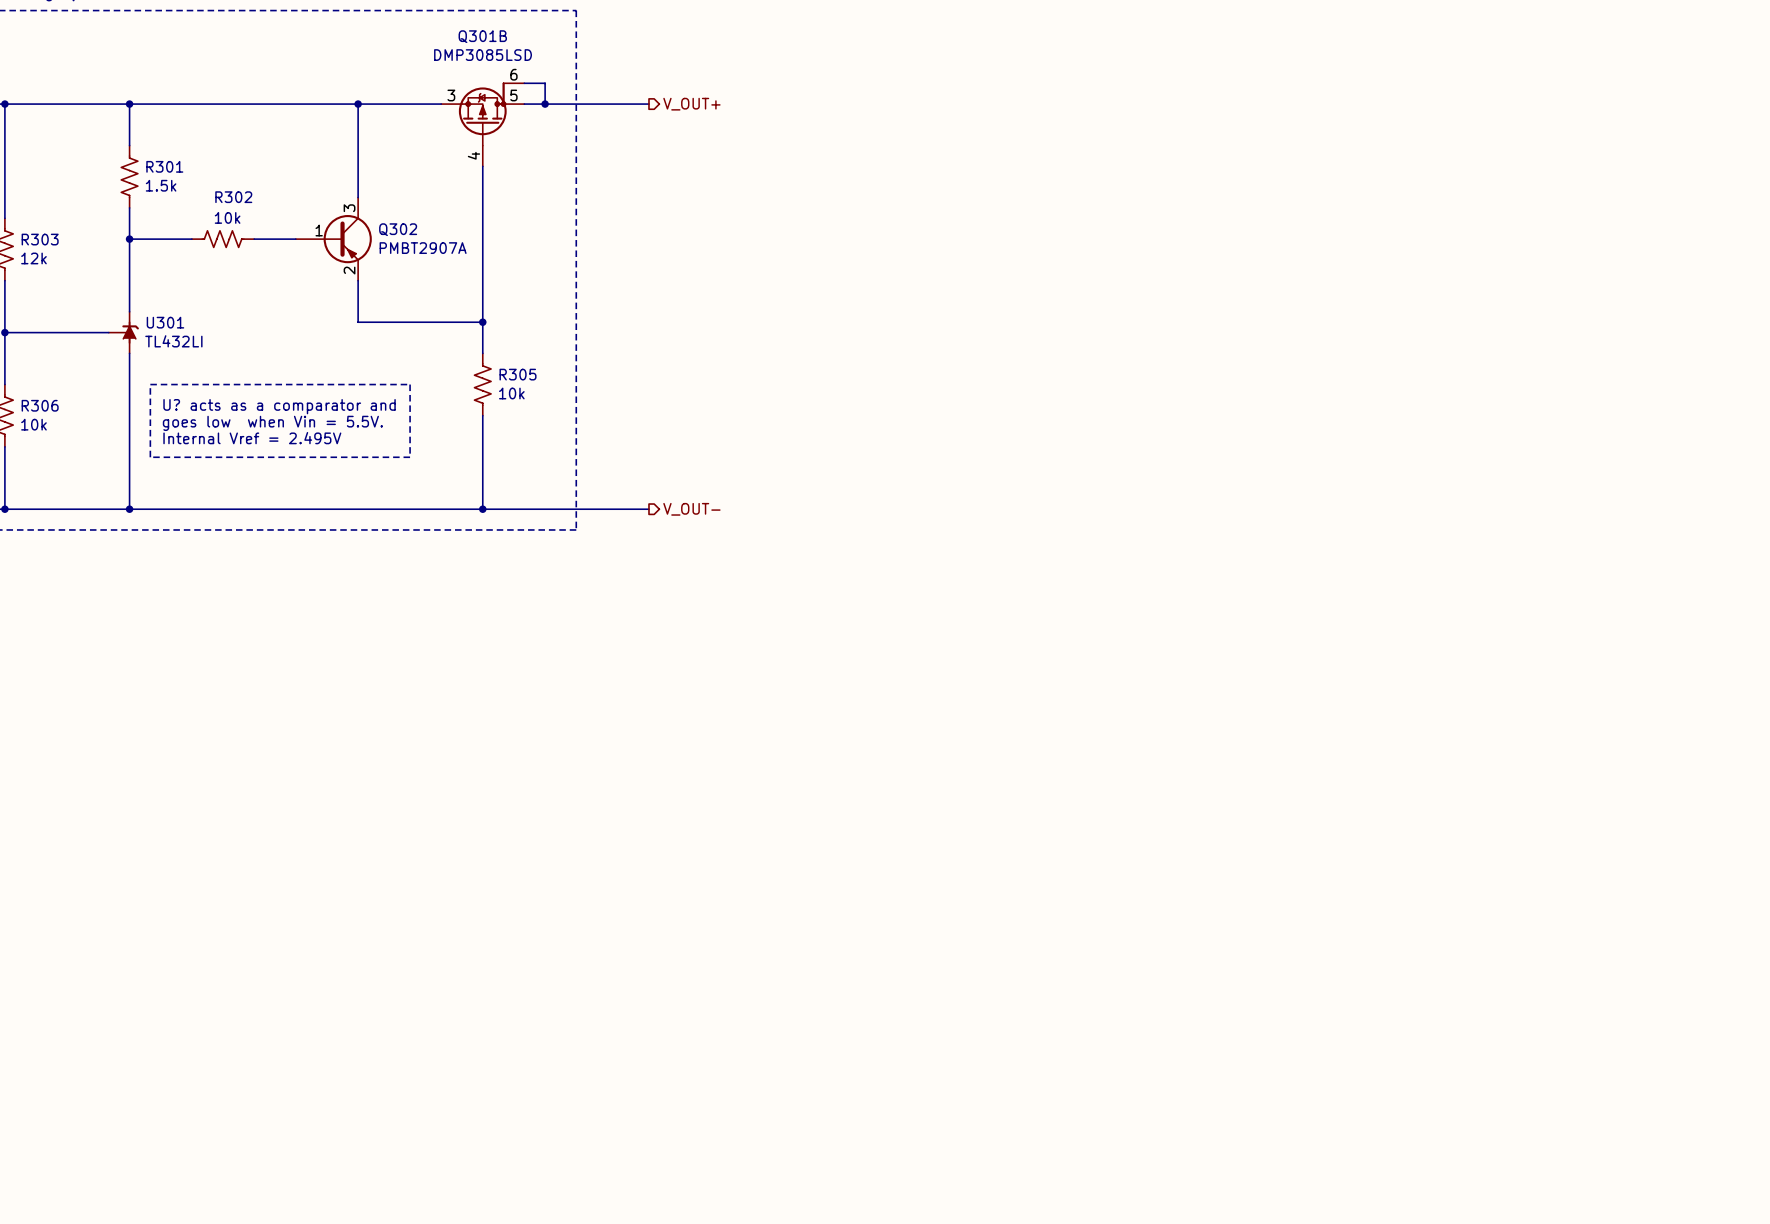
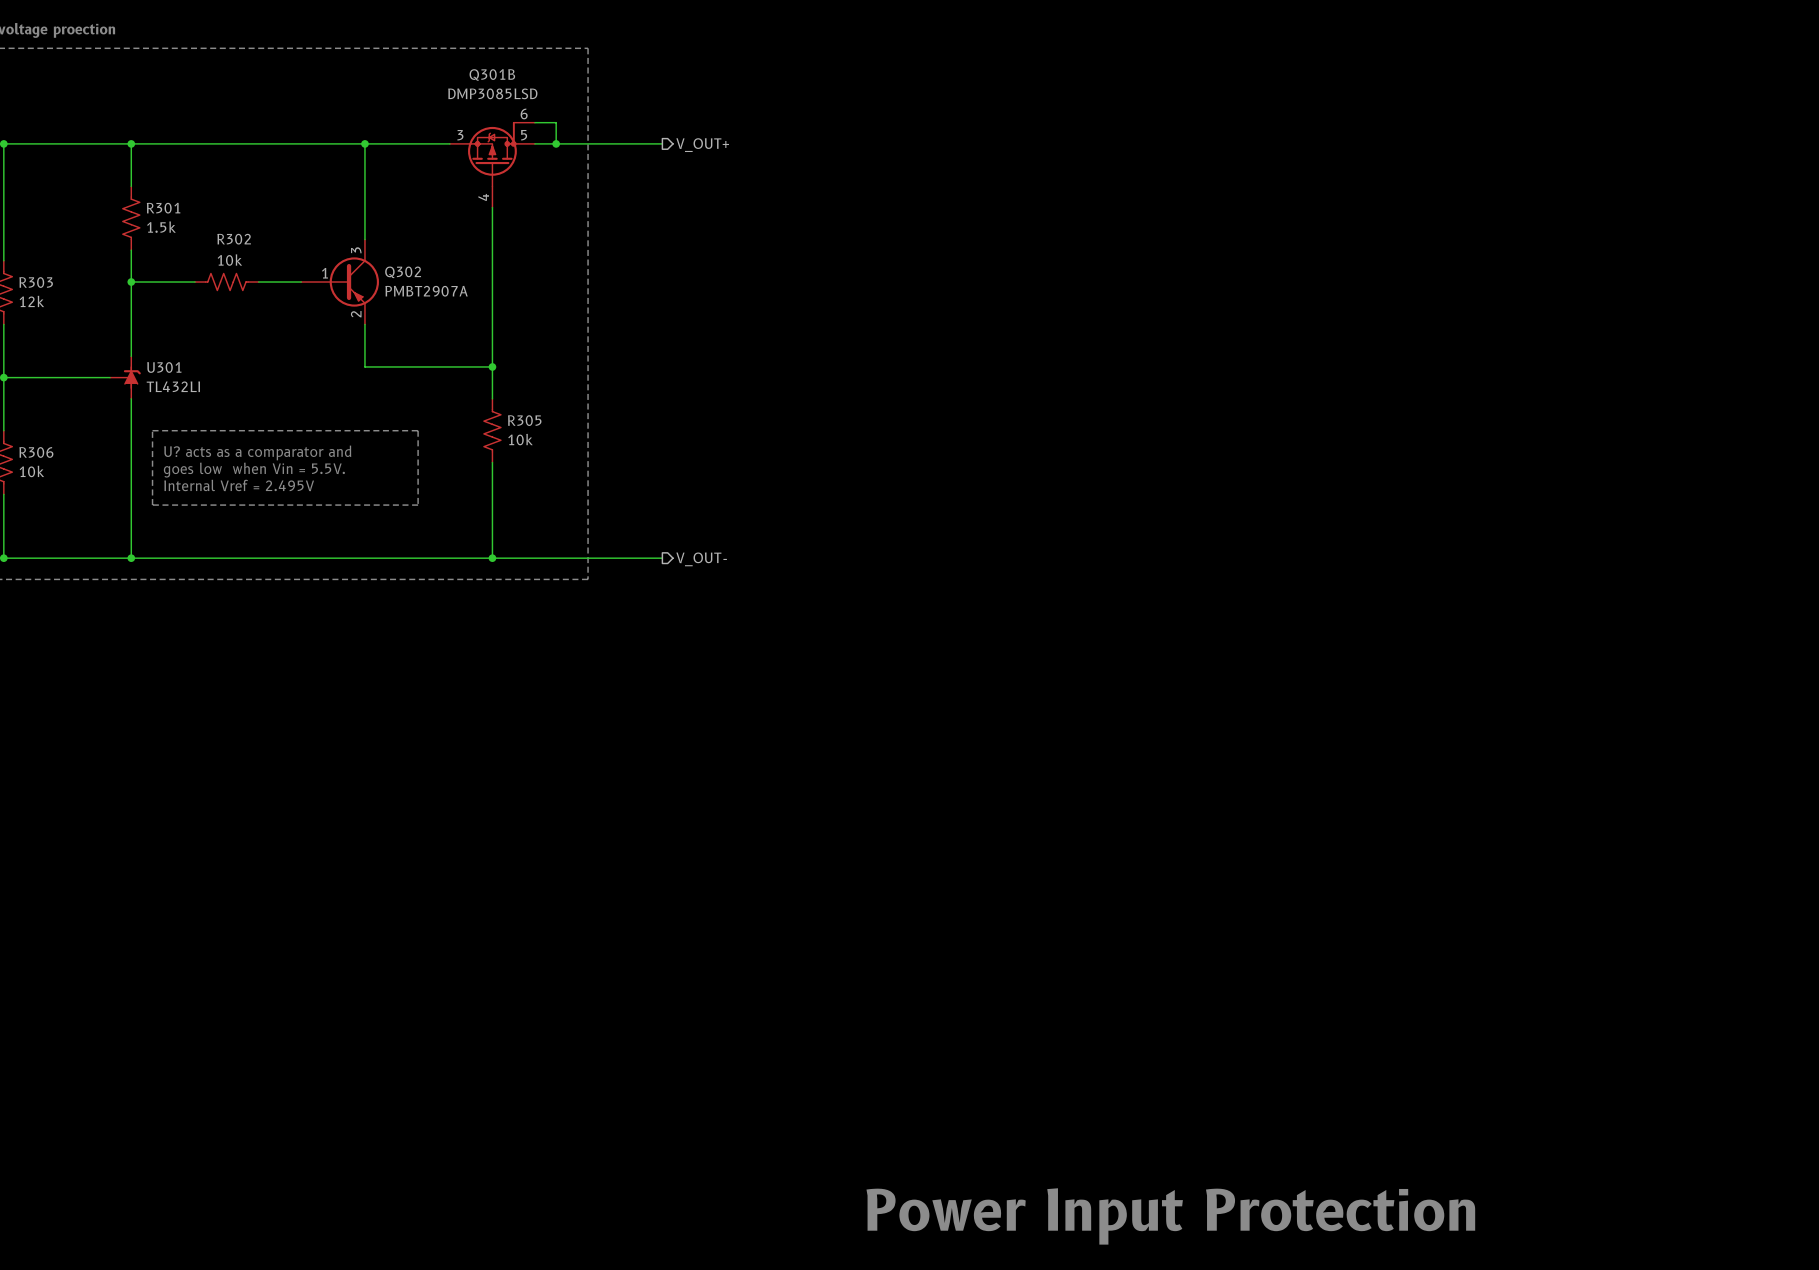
text: none -> Power Input Protection (1170, 1216)

